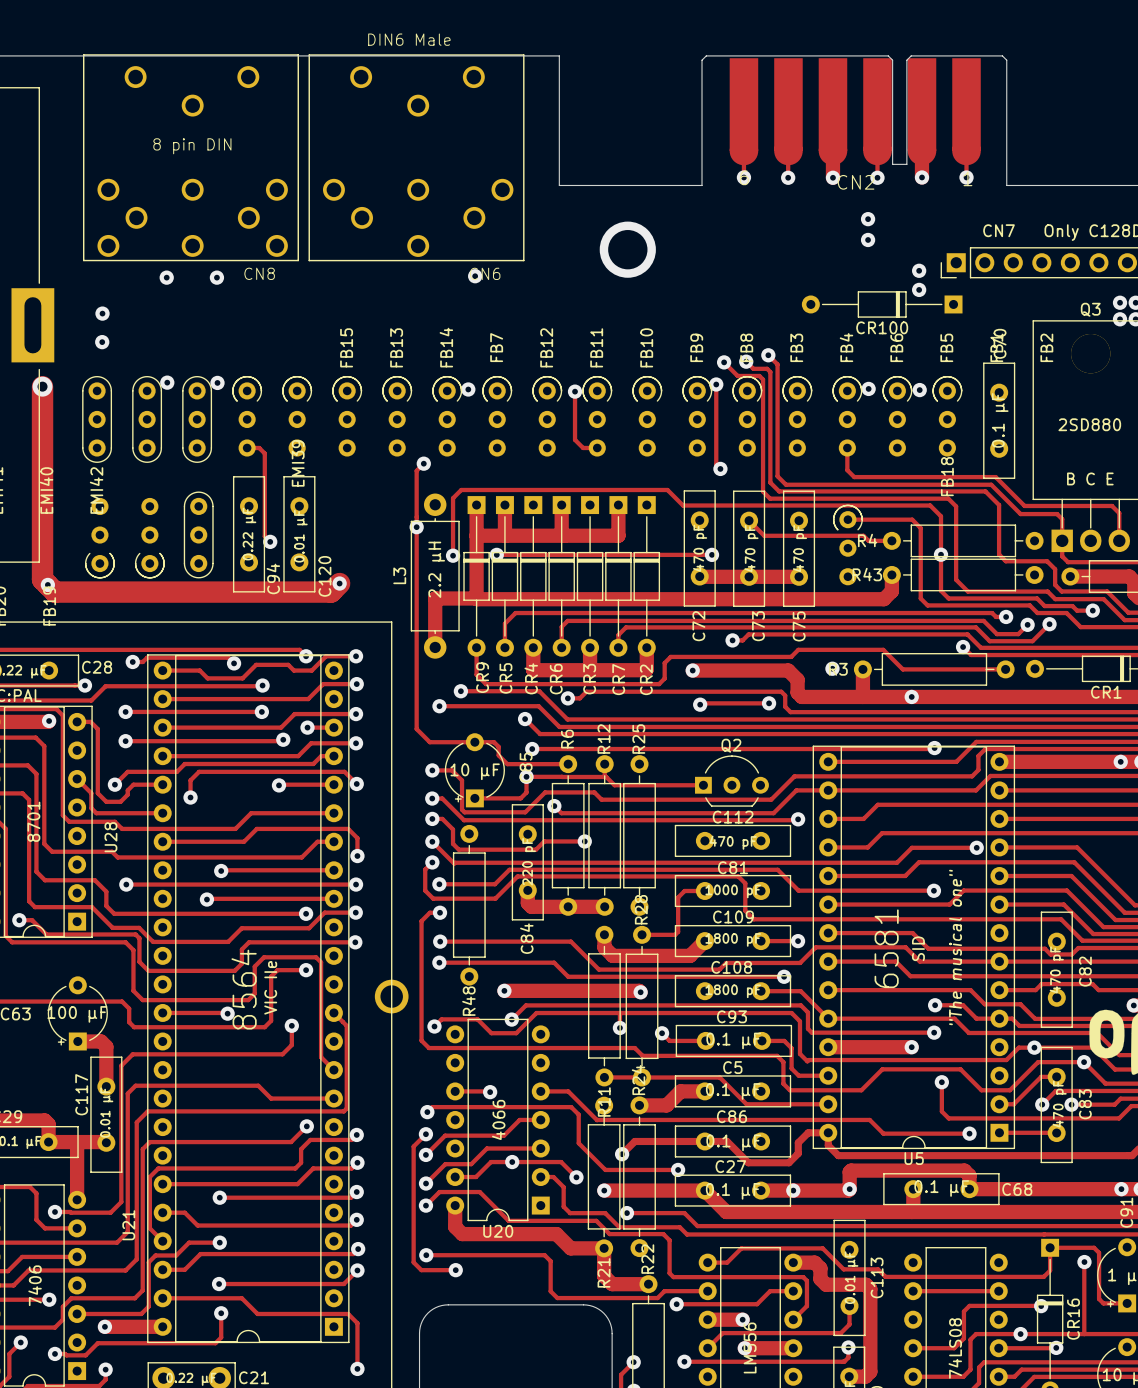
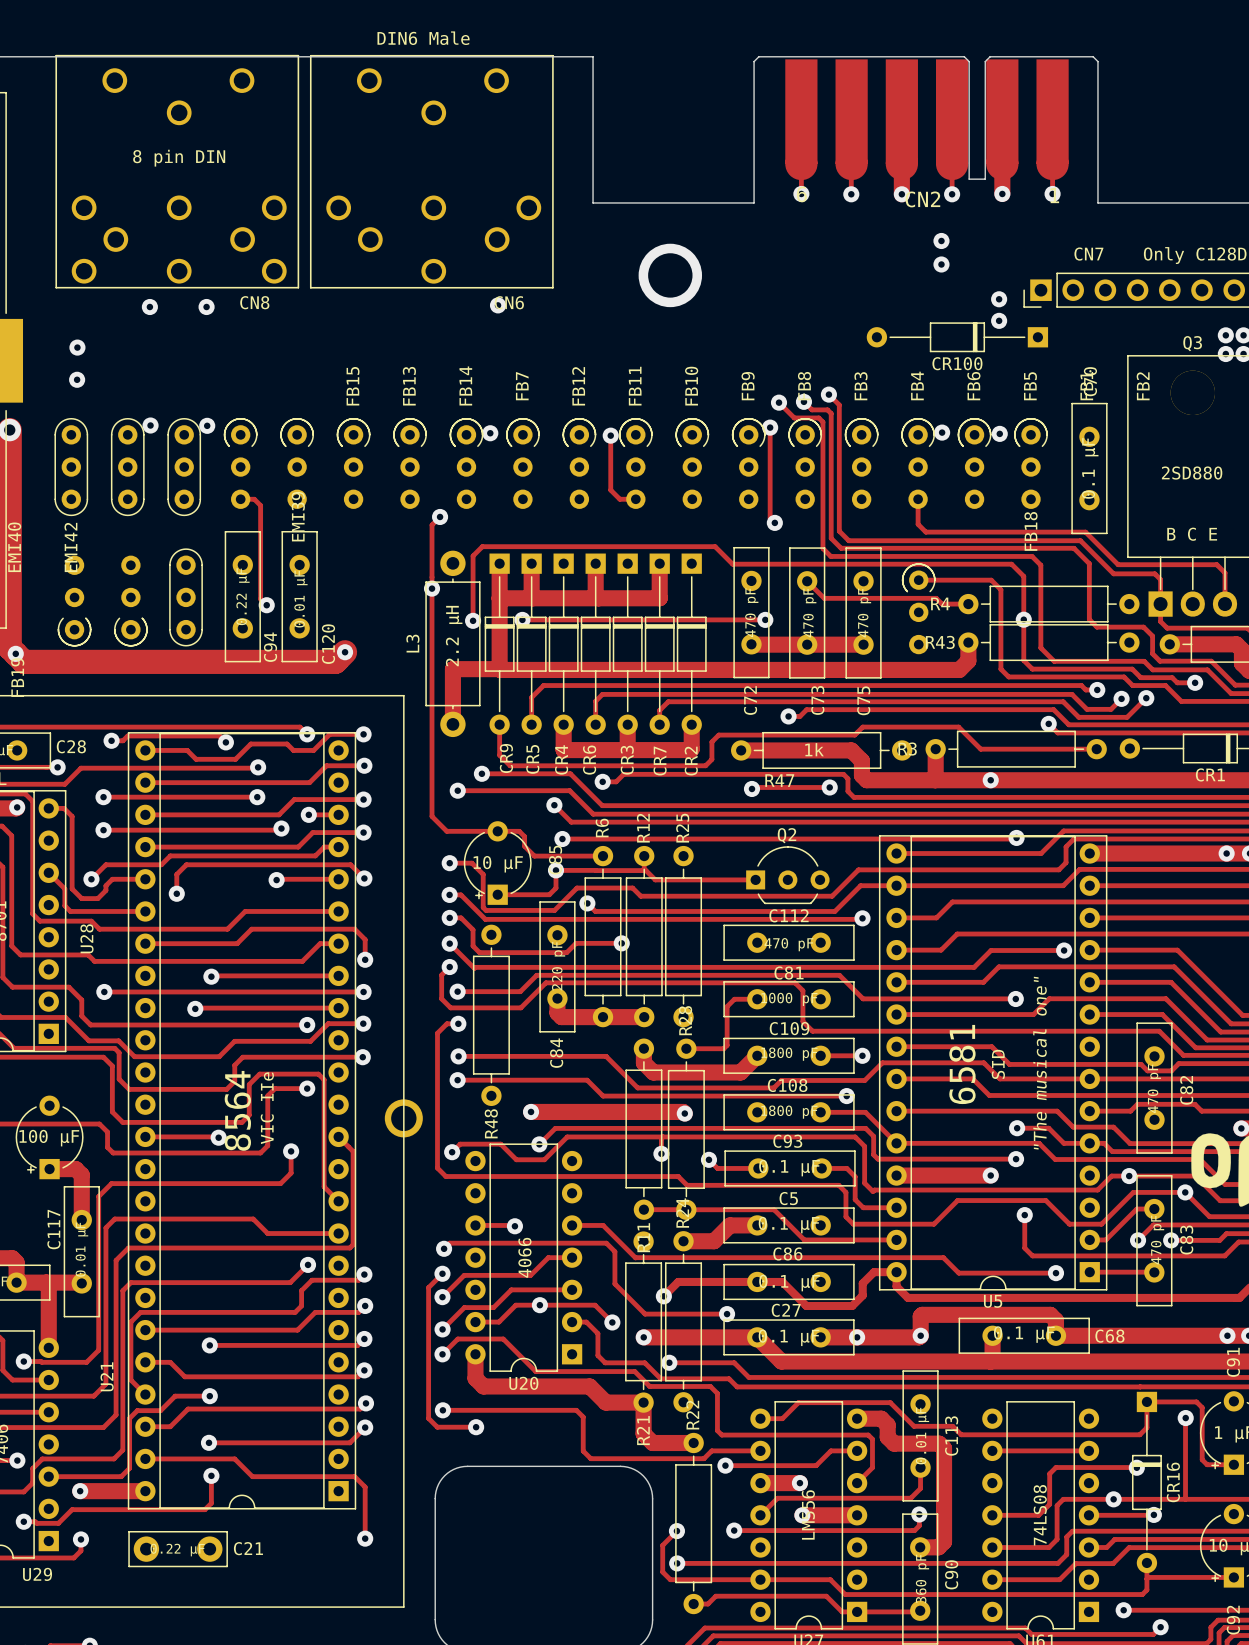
via: (832, 668) -> none
via: (692, 670) -> none
R47: none -> 1k (821, 750)

